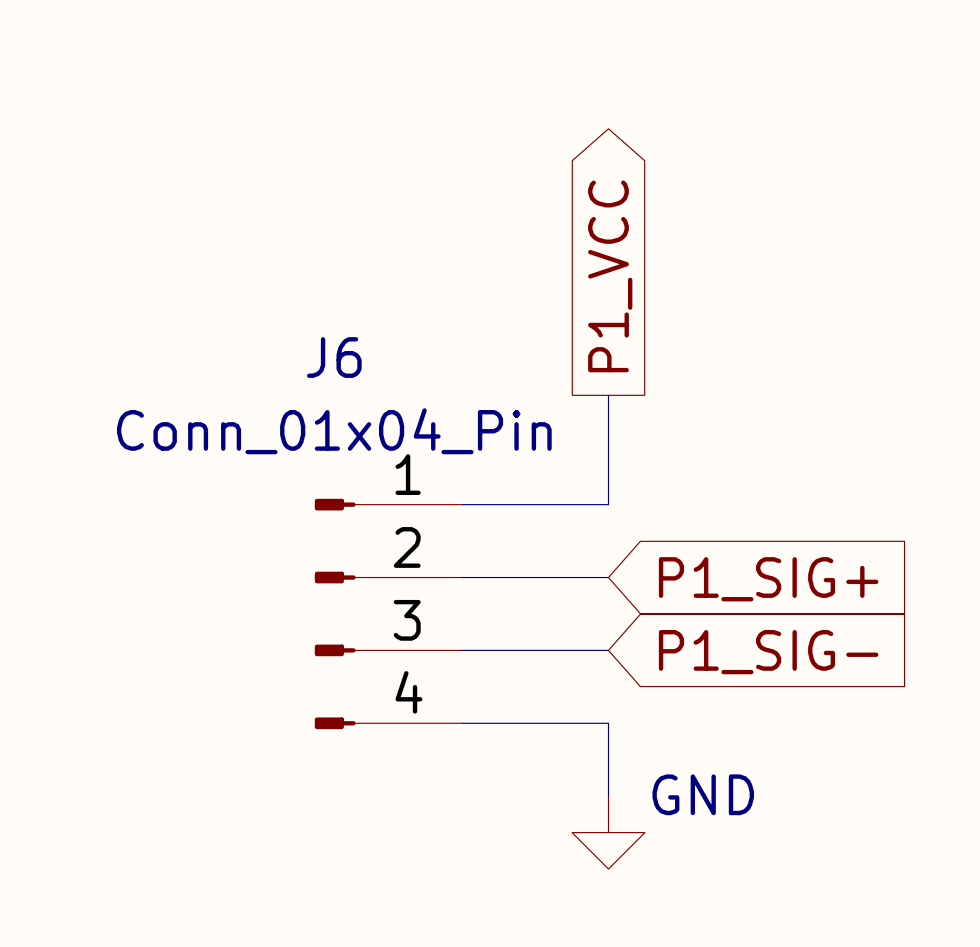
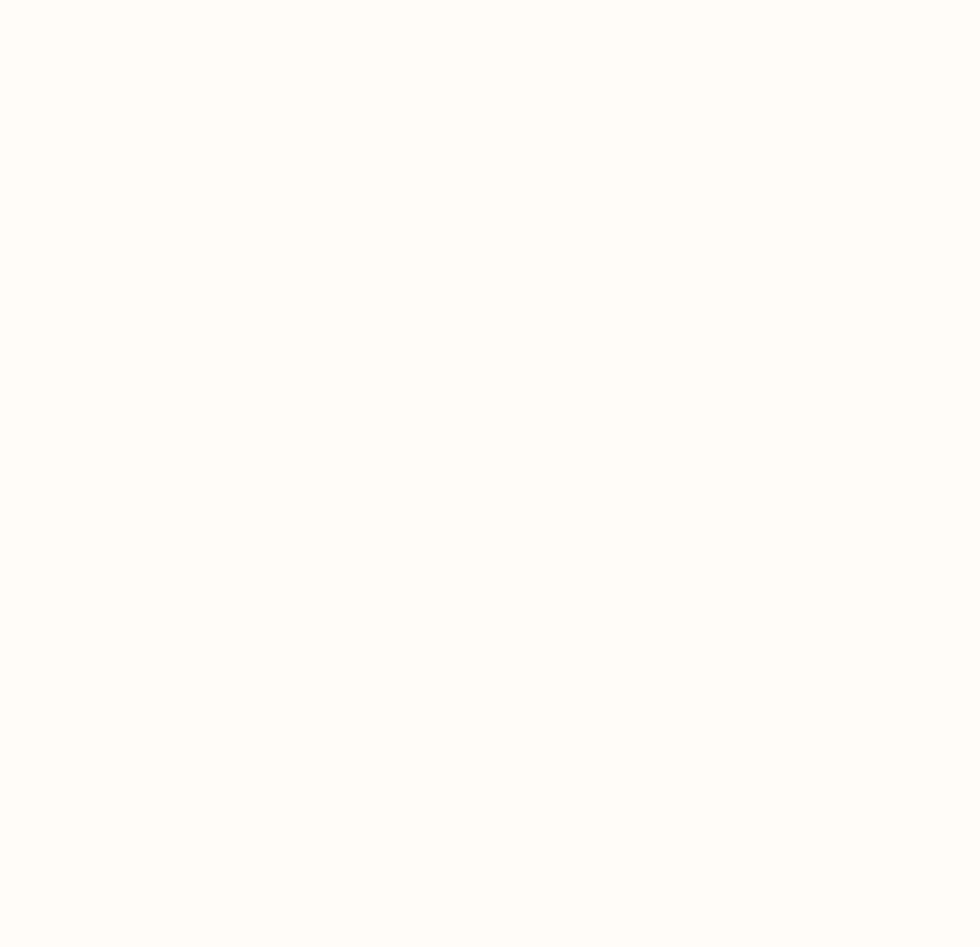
global label: P1_VCC (610, 276) -> none
wire: (608, 395) (608, 504) (462, 504) -> none
wire: (462, 577) (608, 577) -> none
global label: P1_SIG+ (768, 579) -> none
J6: Conn_01x04_Pin (388, 613) -> none
wire: (462, 650) (608, 650) -> none
global label: P1_SIG- (768, 652) -> none
wire: (462, 723) (608, 723) (608, 796) -> none
power symbol: GND (608, 832) -> none

